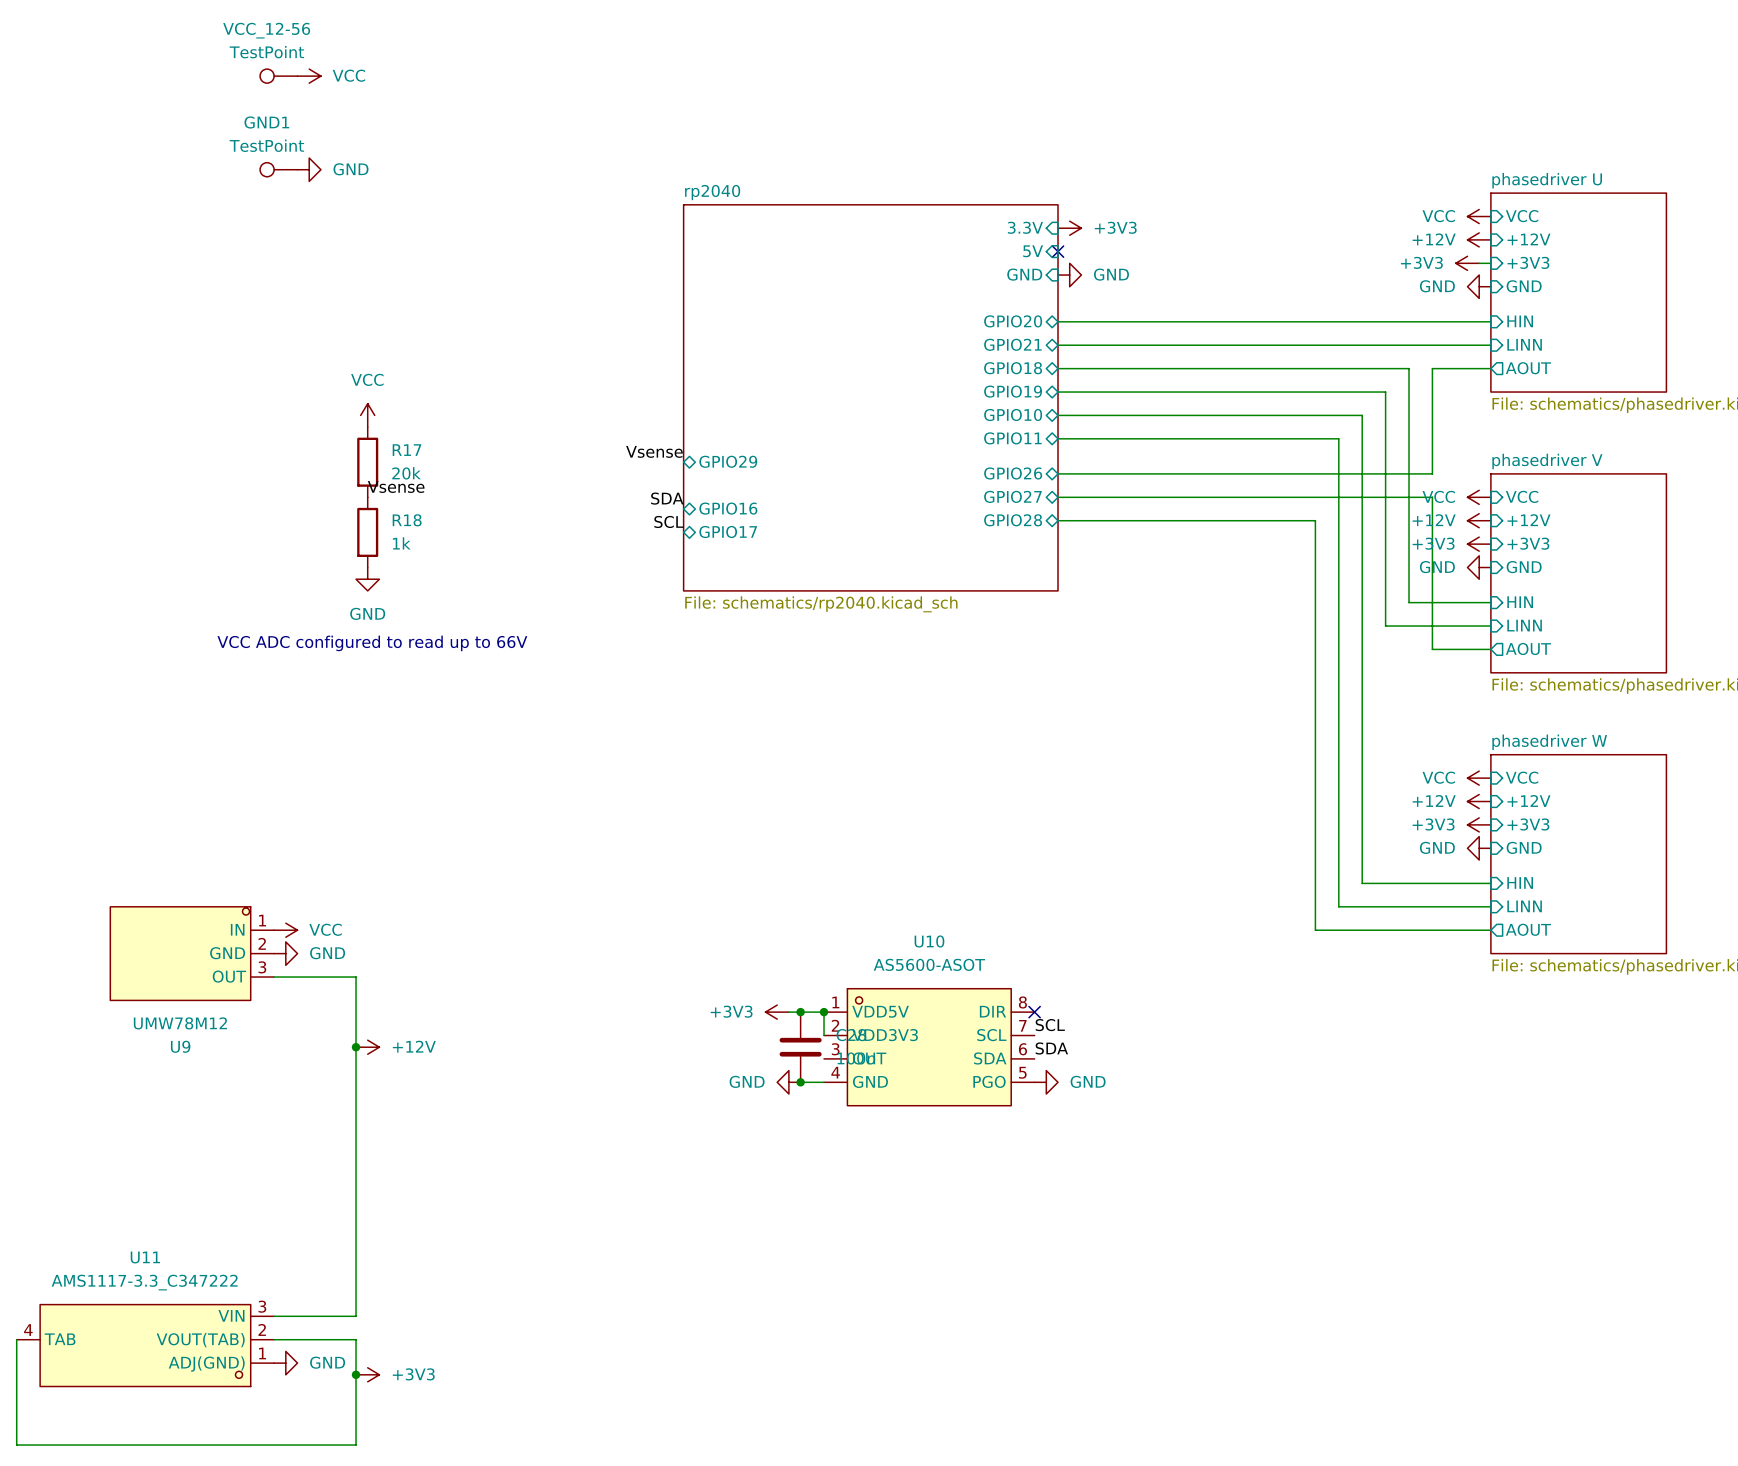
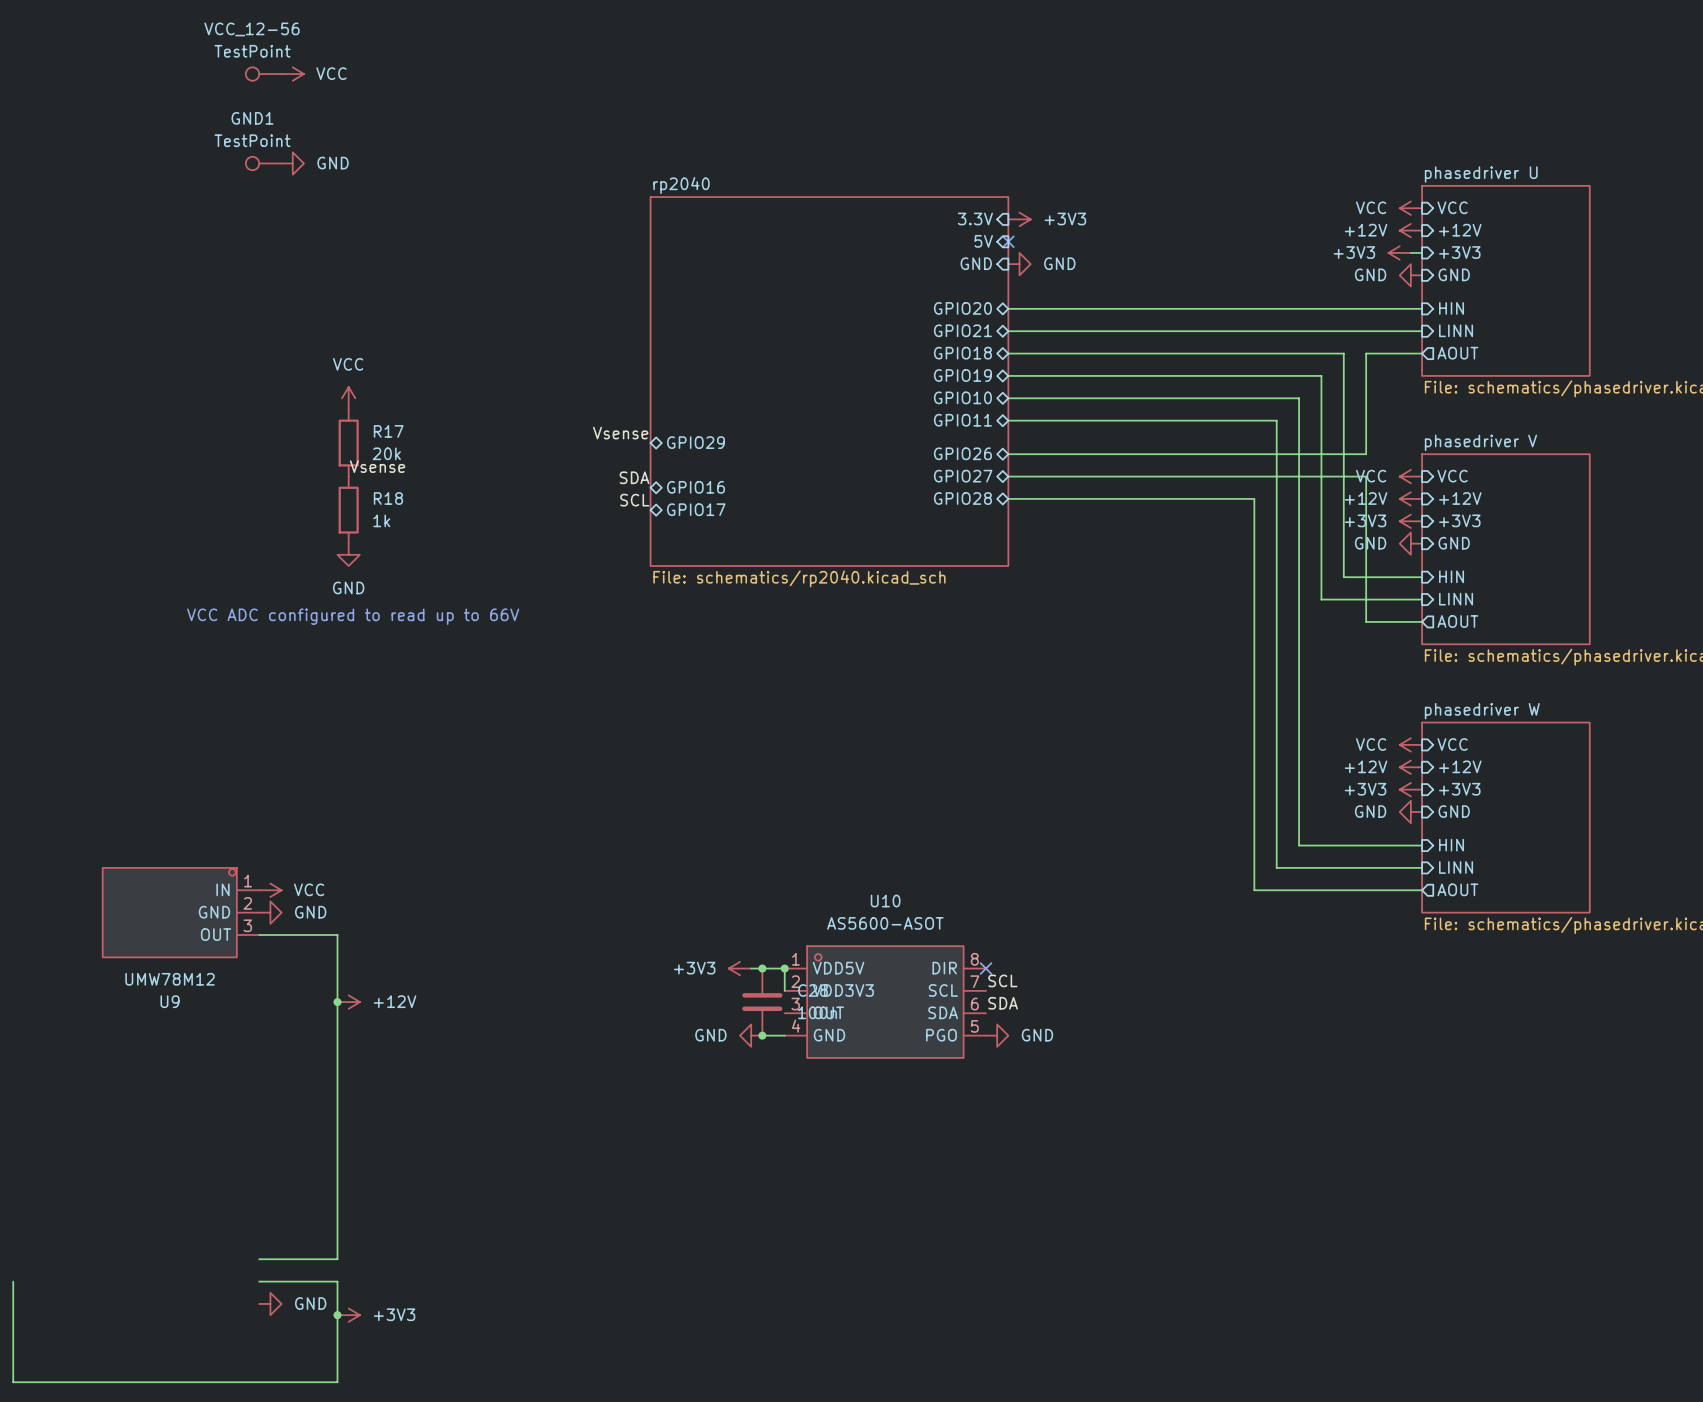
U11: AMS1117-3.3_C347222 (145, 1345) -> none

